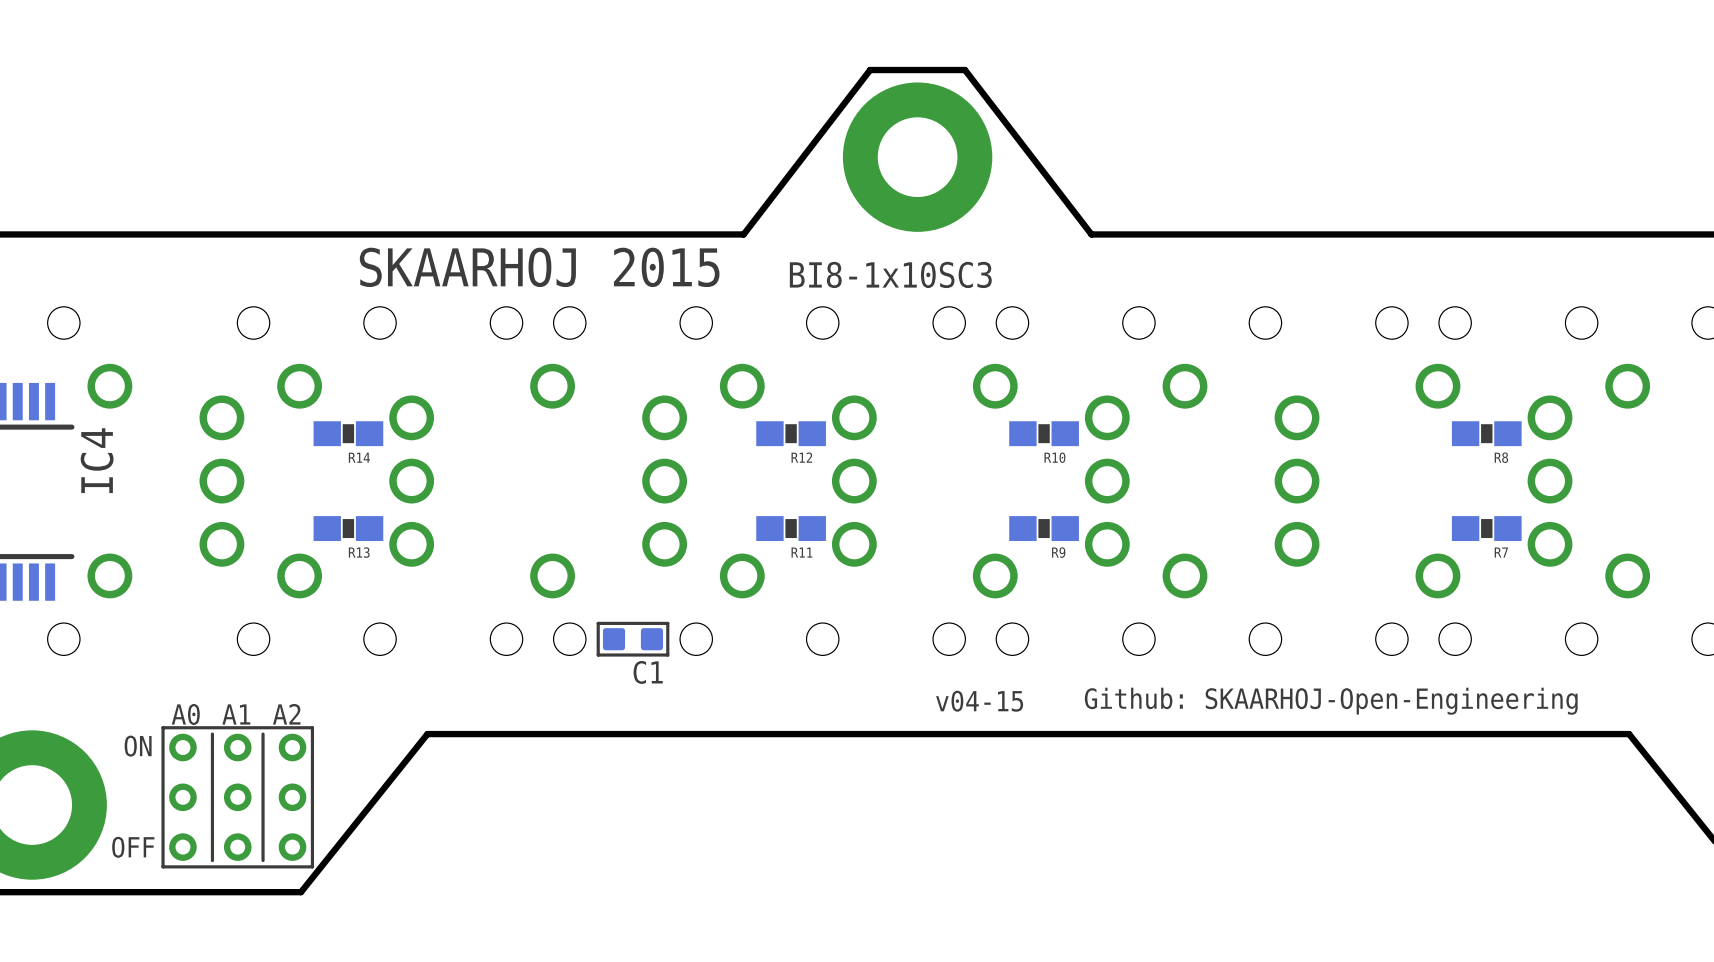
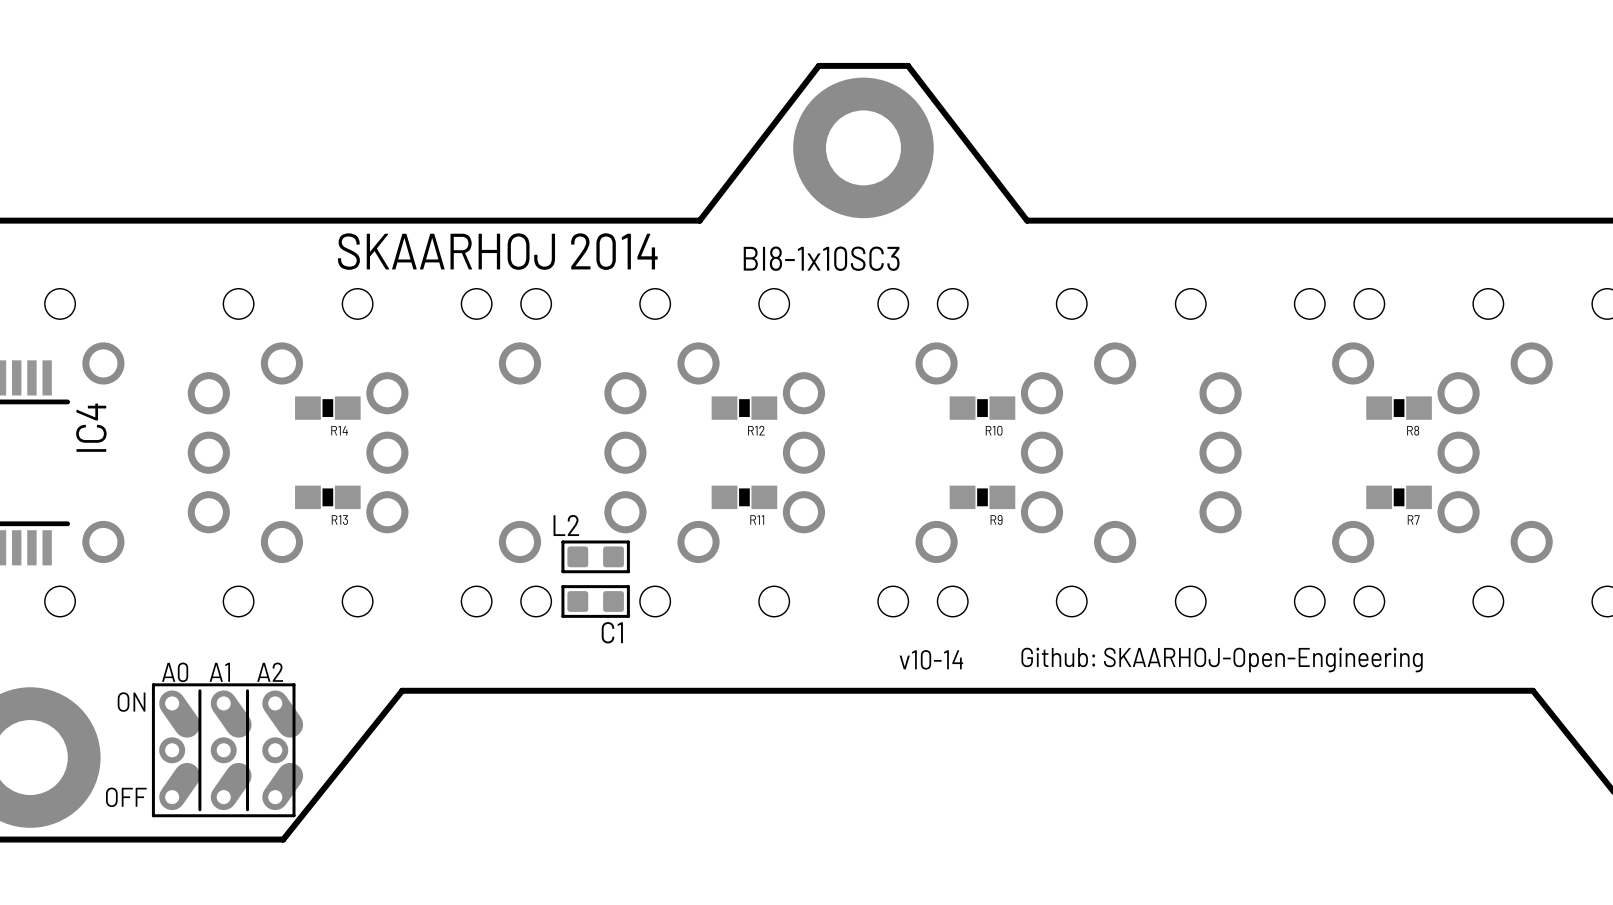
text: SKAARHOJ 2015 (539, 267) -> SKAARHOJ 2014 (497, 251)
L2: none -> (595, 556)
text: v04-15 (979, 701) -> v10-14 (931, 659)
part footprint: [161, 726, 315, 869] -> [151, 683, 304, 818]

